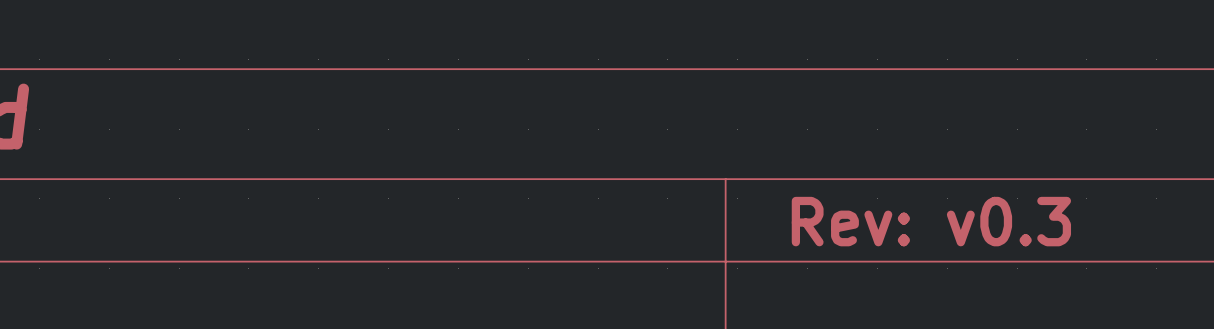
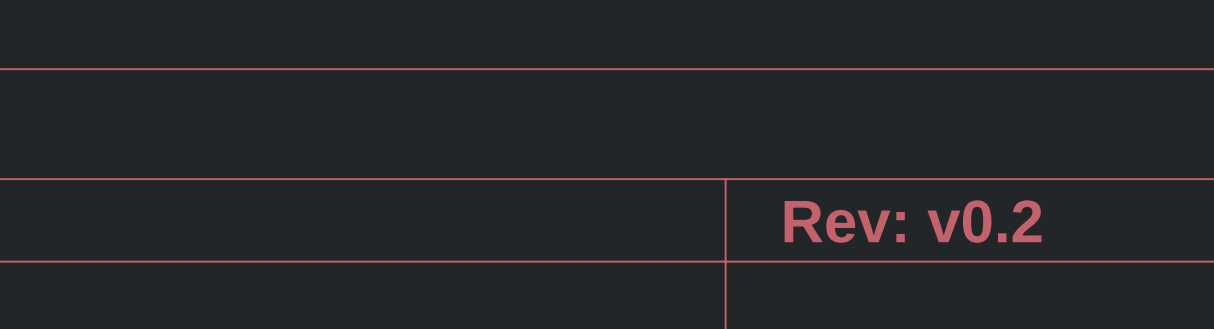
title block: Rev: v0.3 (931, 221) -> Rev: v0.2 (913, 221)

